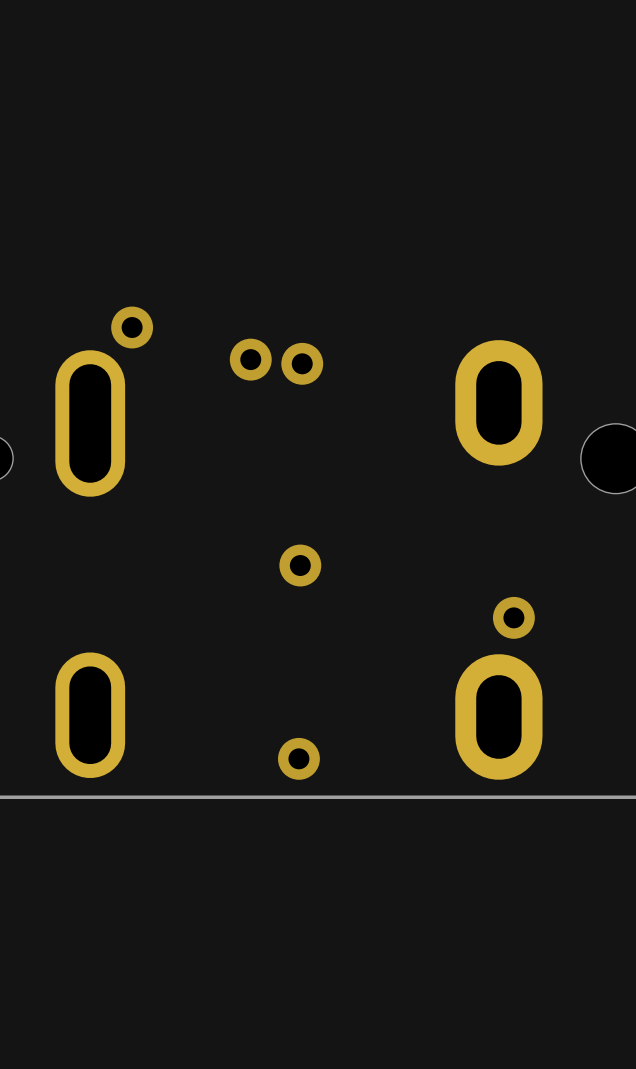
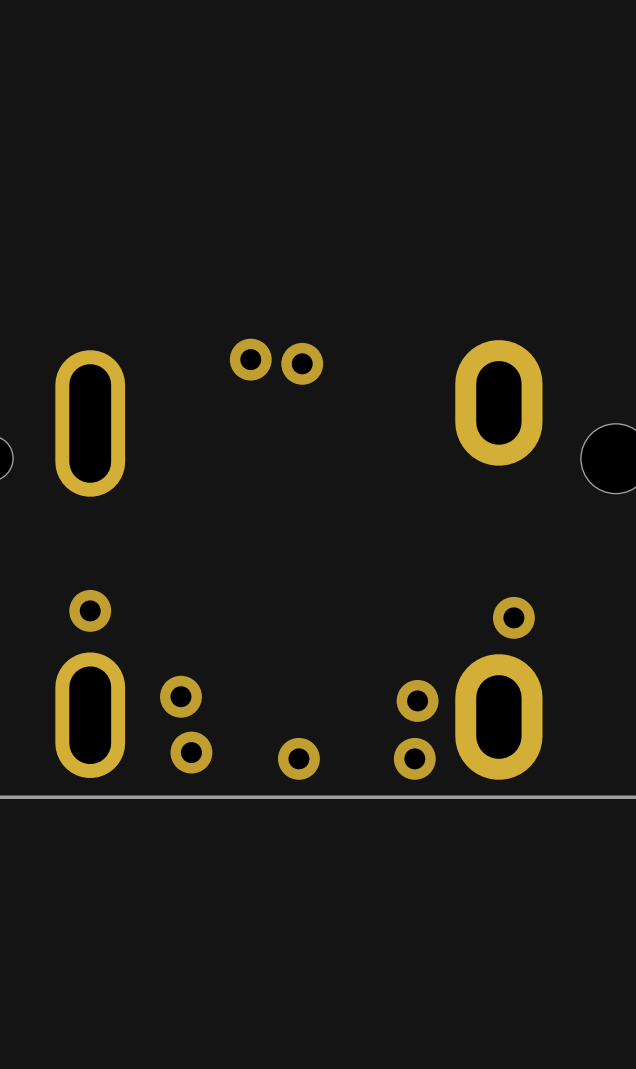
via: (132, 327) -> none
via: (300, 565) -> none
via: none -> (90, 610)
via: none -> (180, 696)
via: none -> (417, 700)
via: none -> (191, 752)
via: none -> (414, 758)

